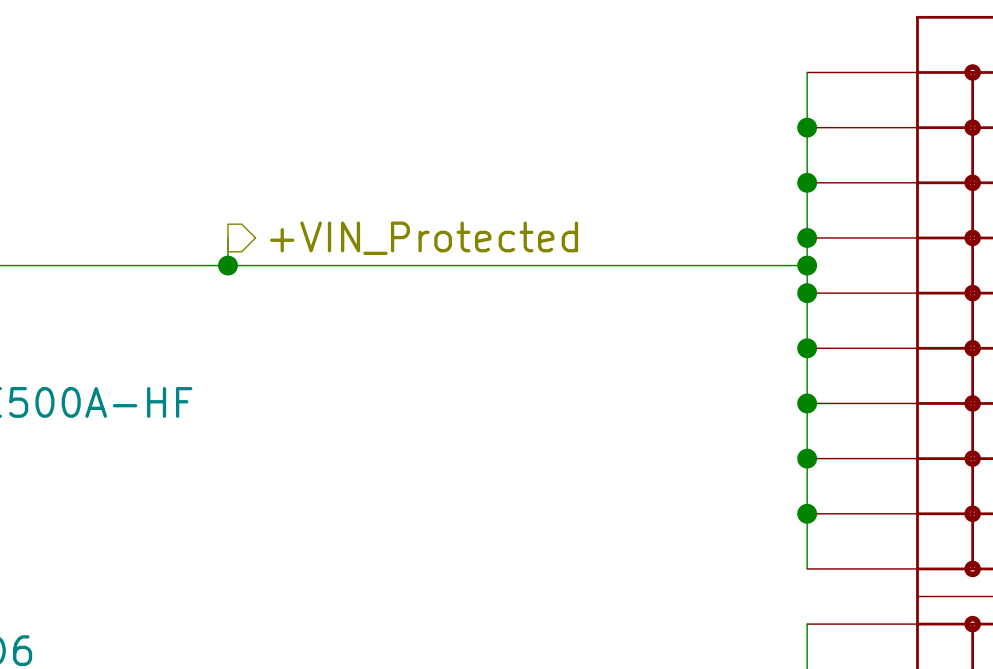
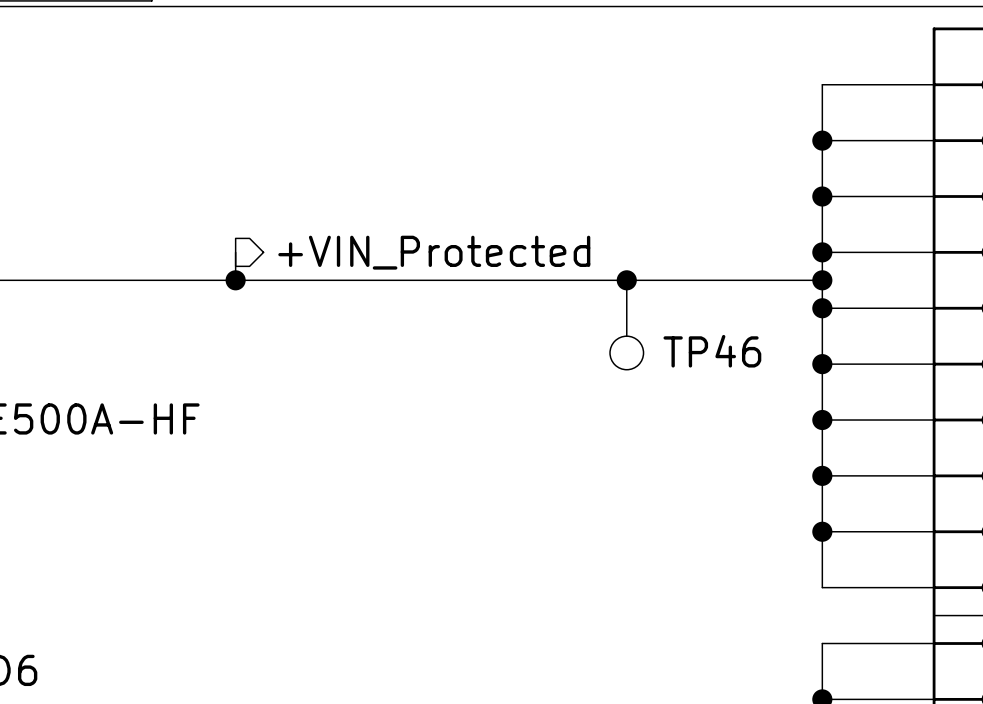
junction: none -> (626, 280)
TP46: none -> (626, 325)

